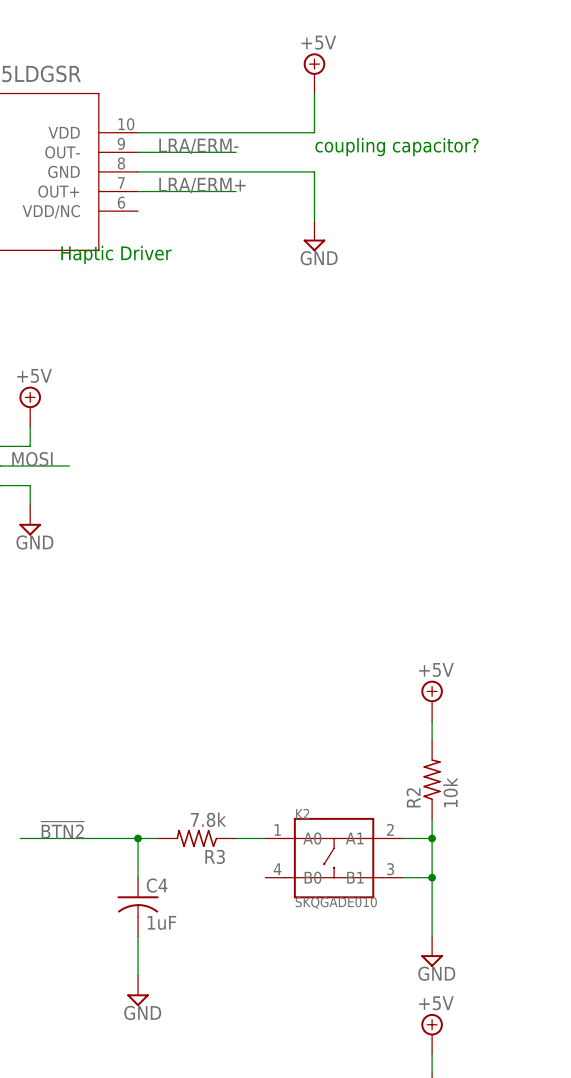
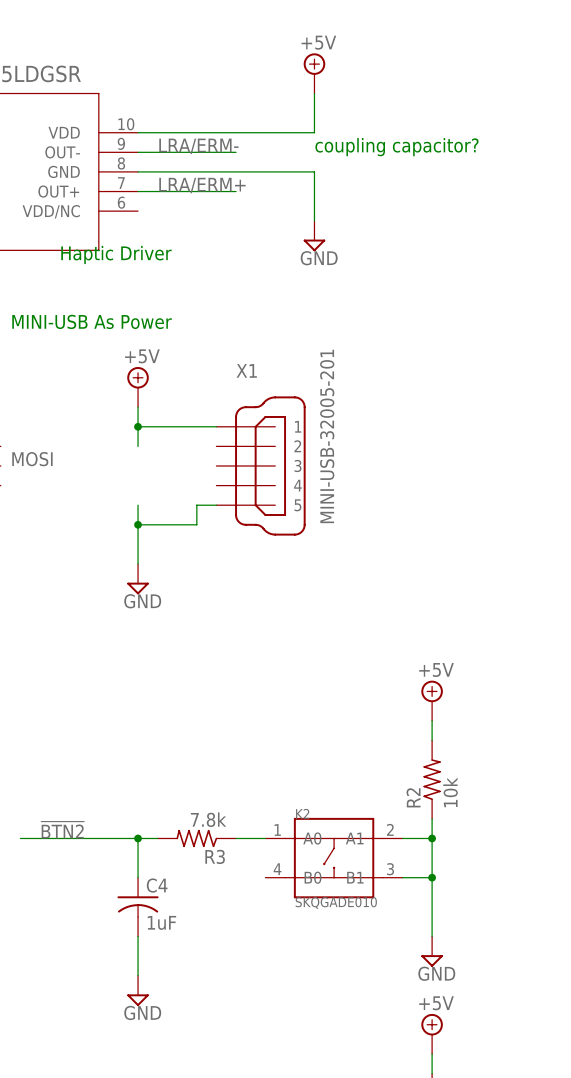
text: none -> MINI-USB As Power (92, 321)
power symbol: none -> +5V (138, 387)
power symbol: +5V (30, 406) -> none
wire: none -> (138, 407) (138, 446)
wire: (30, 426) (30, 446) (0, 446) -> none
wire: none -> (138, 426) (216, 426)
junction: none -> (138, 426)
wire: (0, 465) (69, 465) -> none
X1: none -> MINI-USB-32005-201 (261, 465)
wire: (0, 485) (30, 485) (30, 505) -> none
wire: none -> (138, 505) (138, 564)
wire: none -> (216, 505) (196, 505) (196, 524) (138, 524)
power symbol: GND (30, 520) -> none
junction: none -> (138, 524)
power symbol: none -> GND (138, 579)

